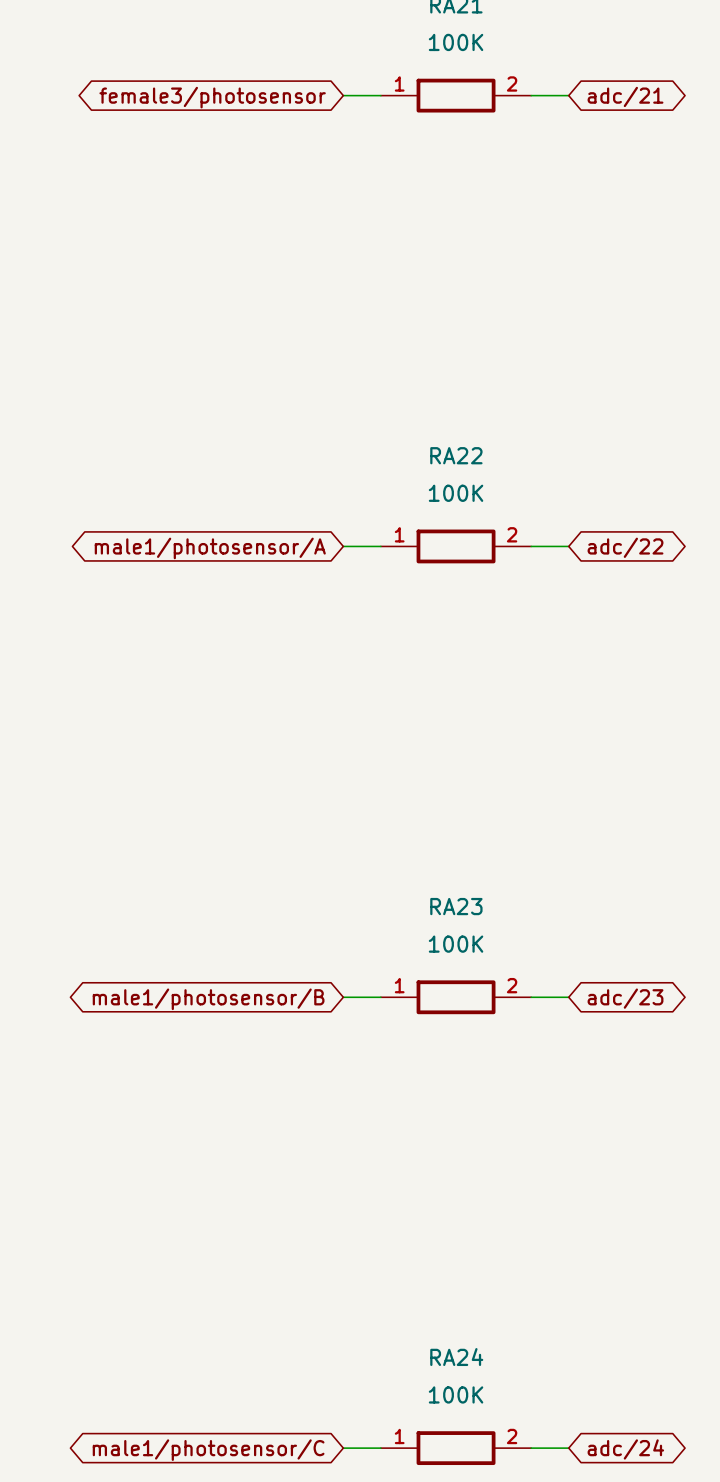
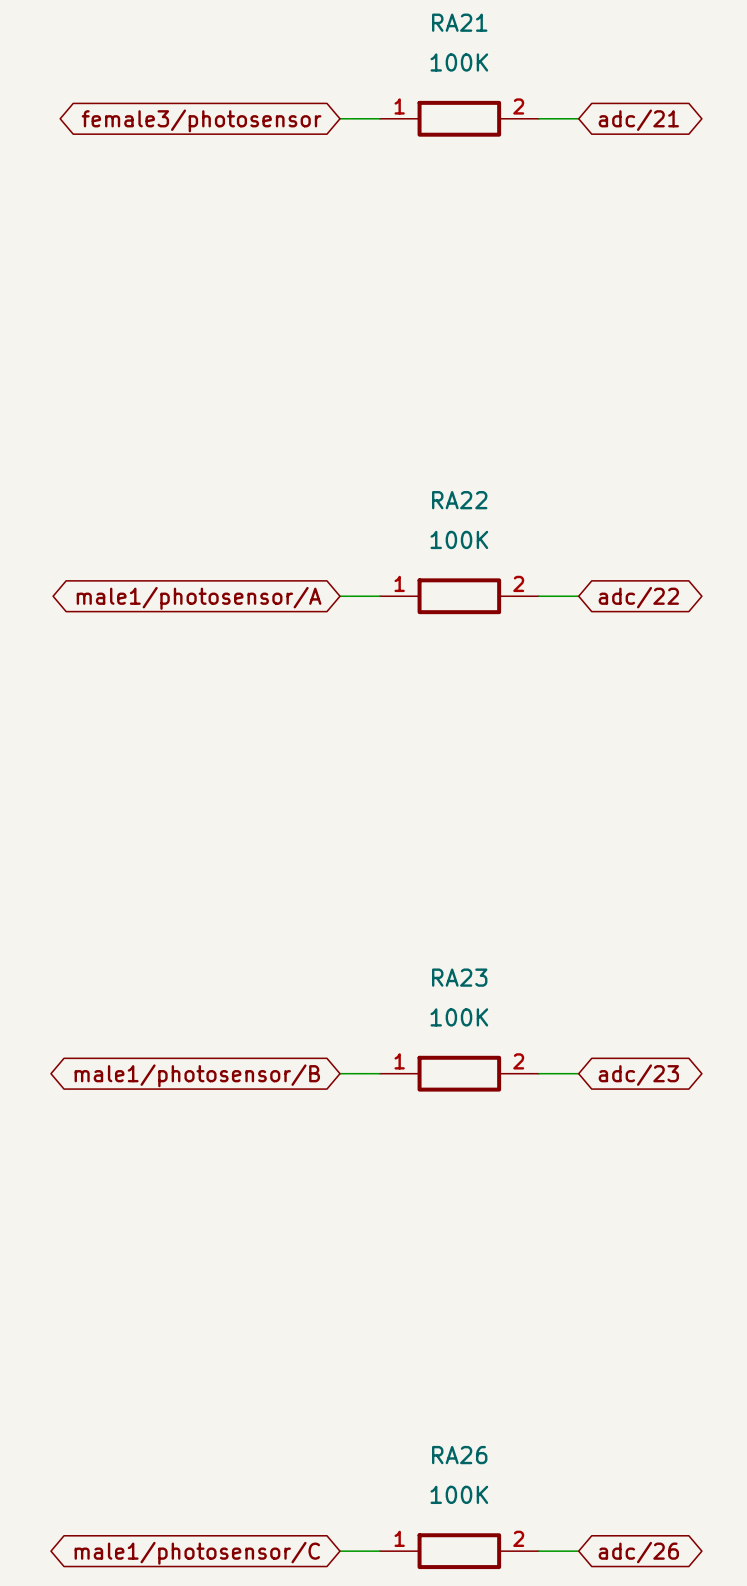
RA24 name: RA24 (456, 1357) -> RA26 (459, 1455)
global label: adc/24 (625, 1449) -> adc/26 (638, 1552)

